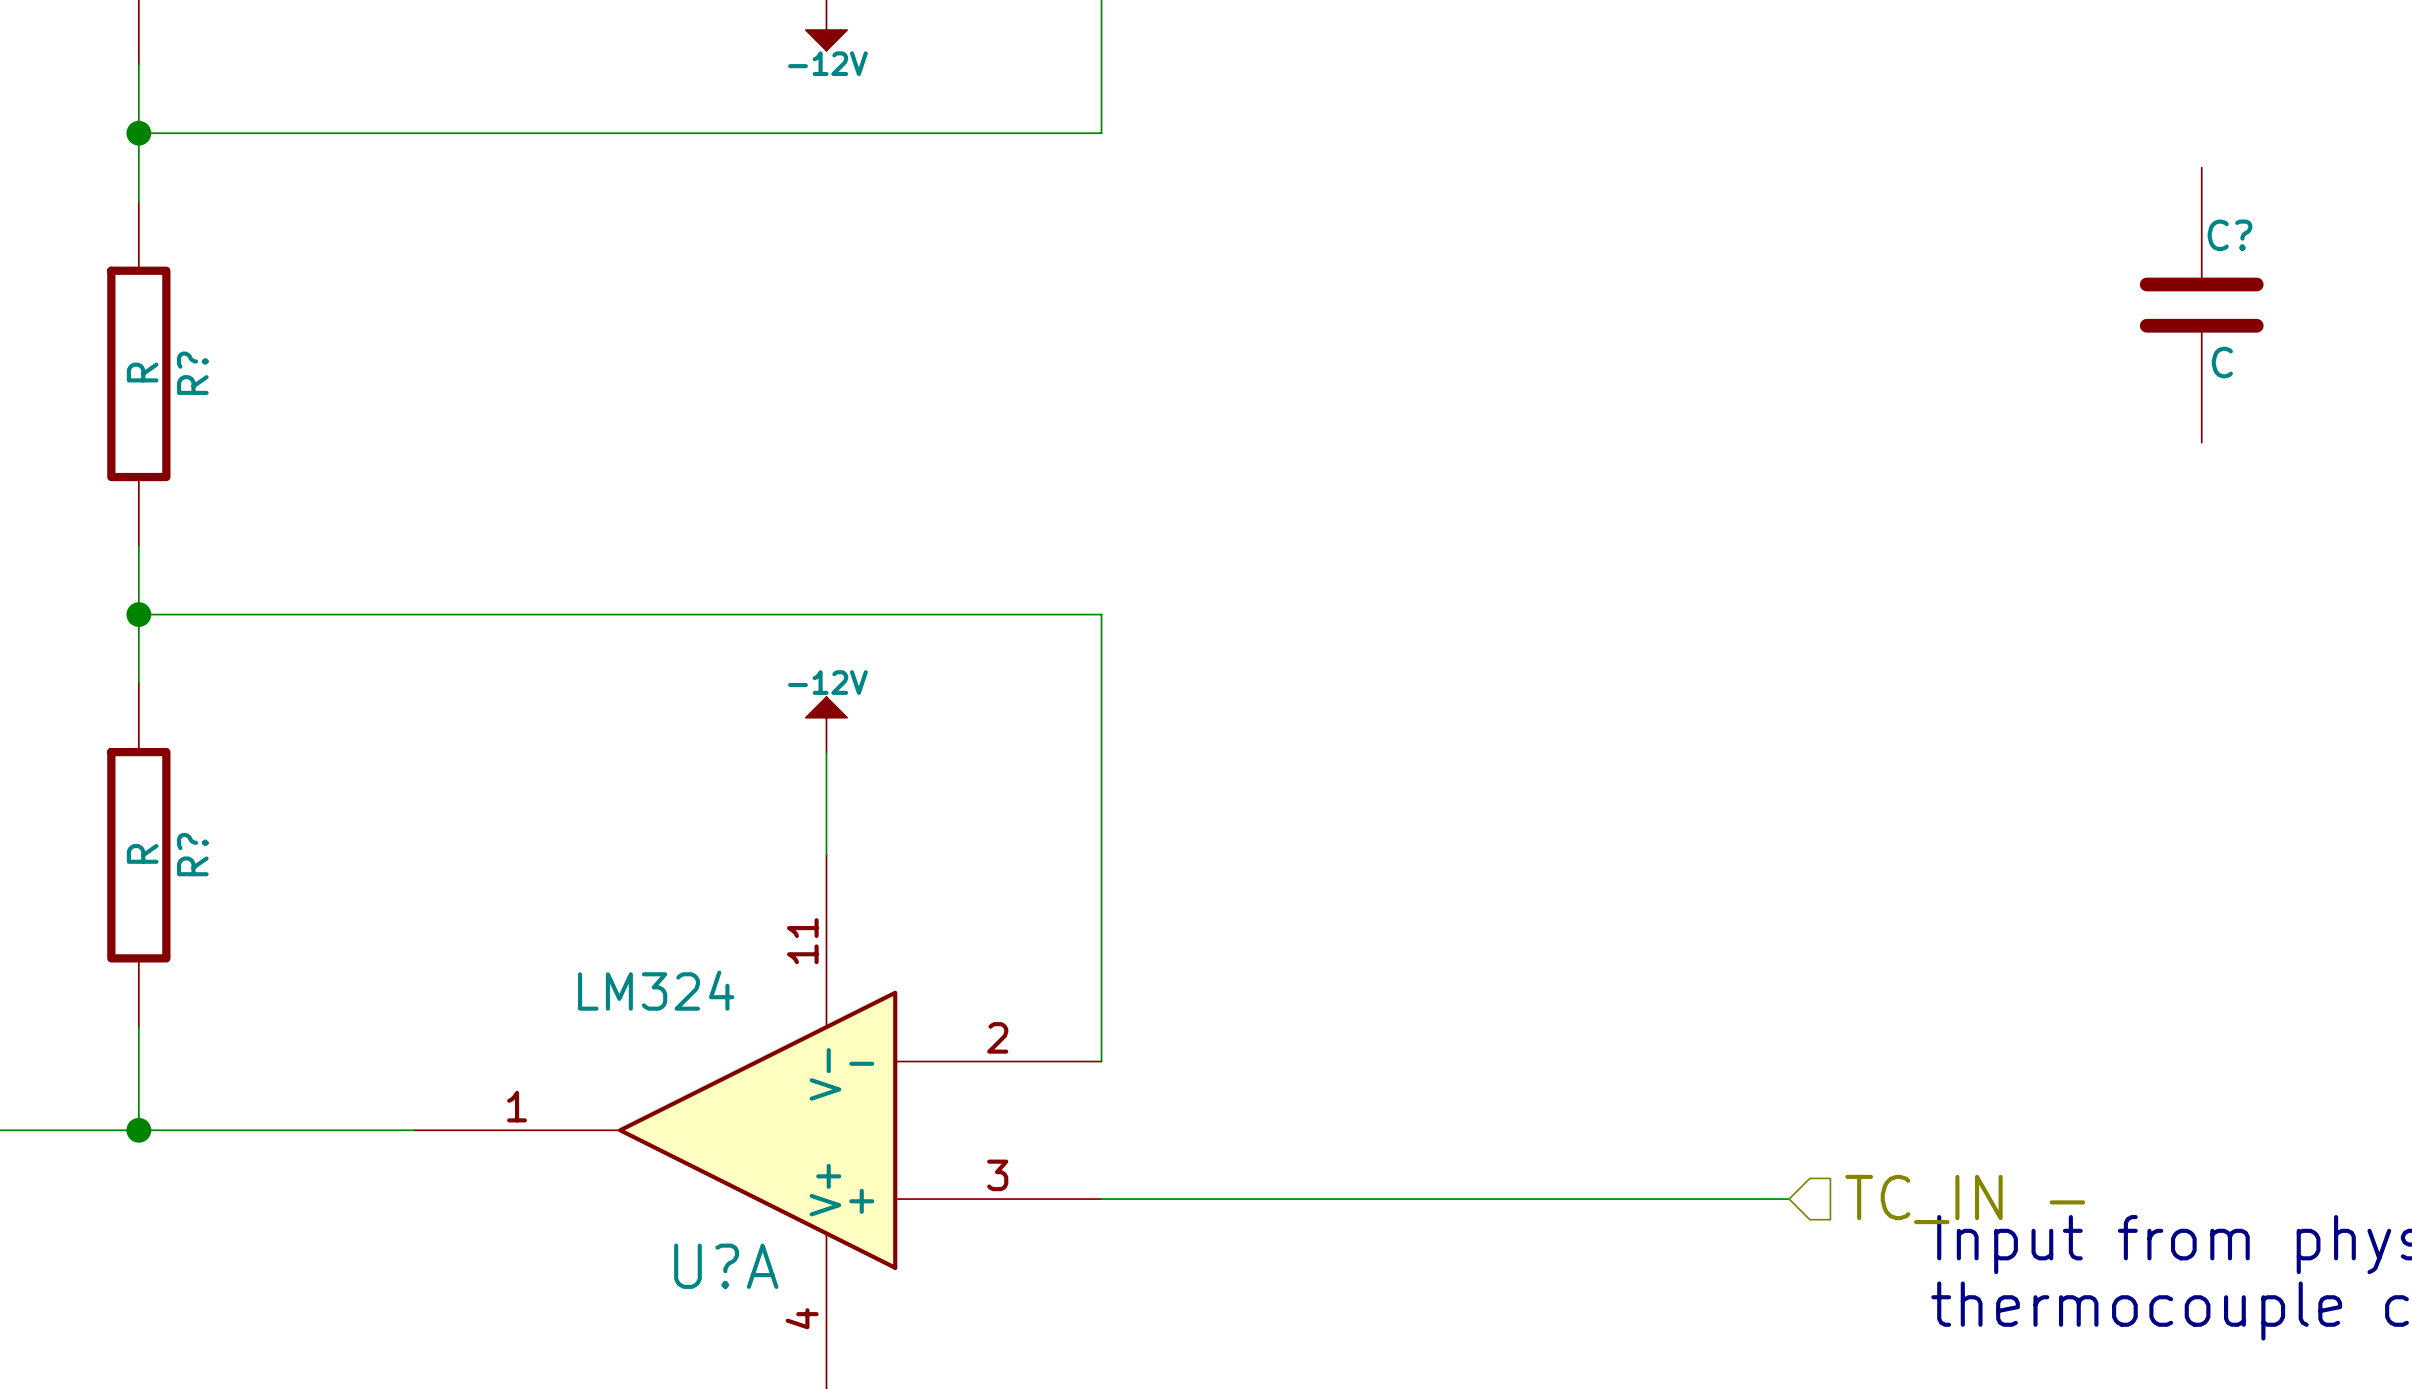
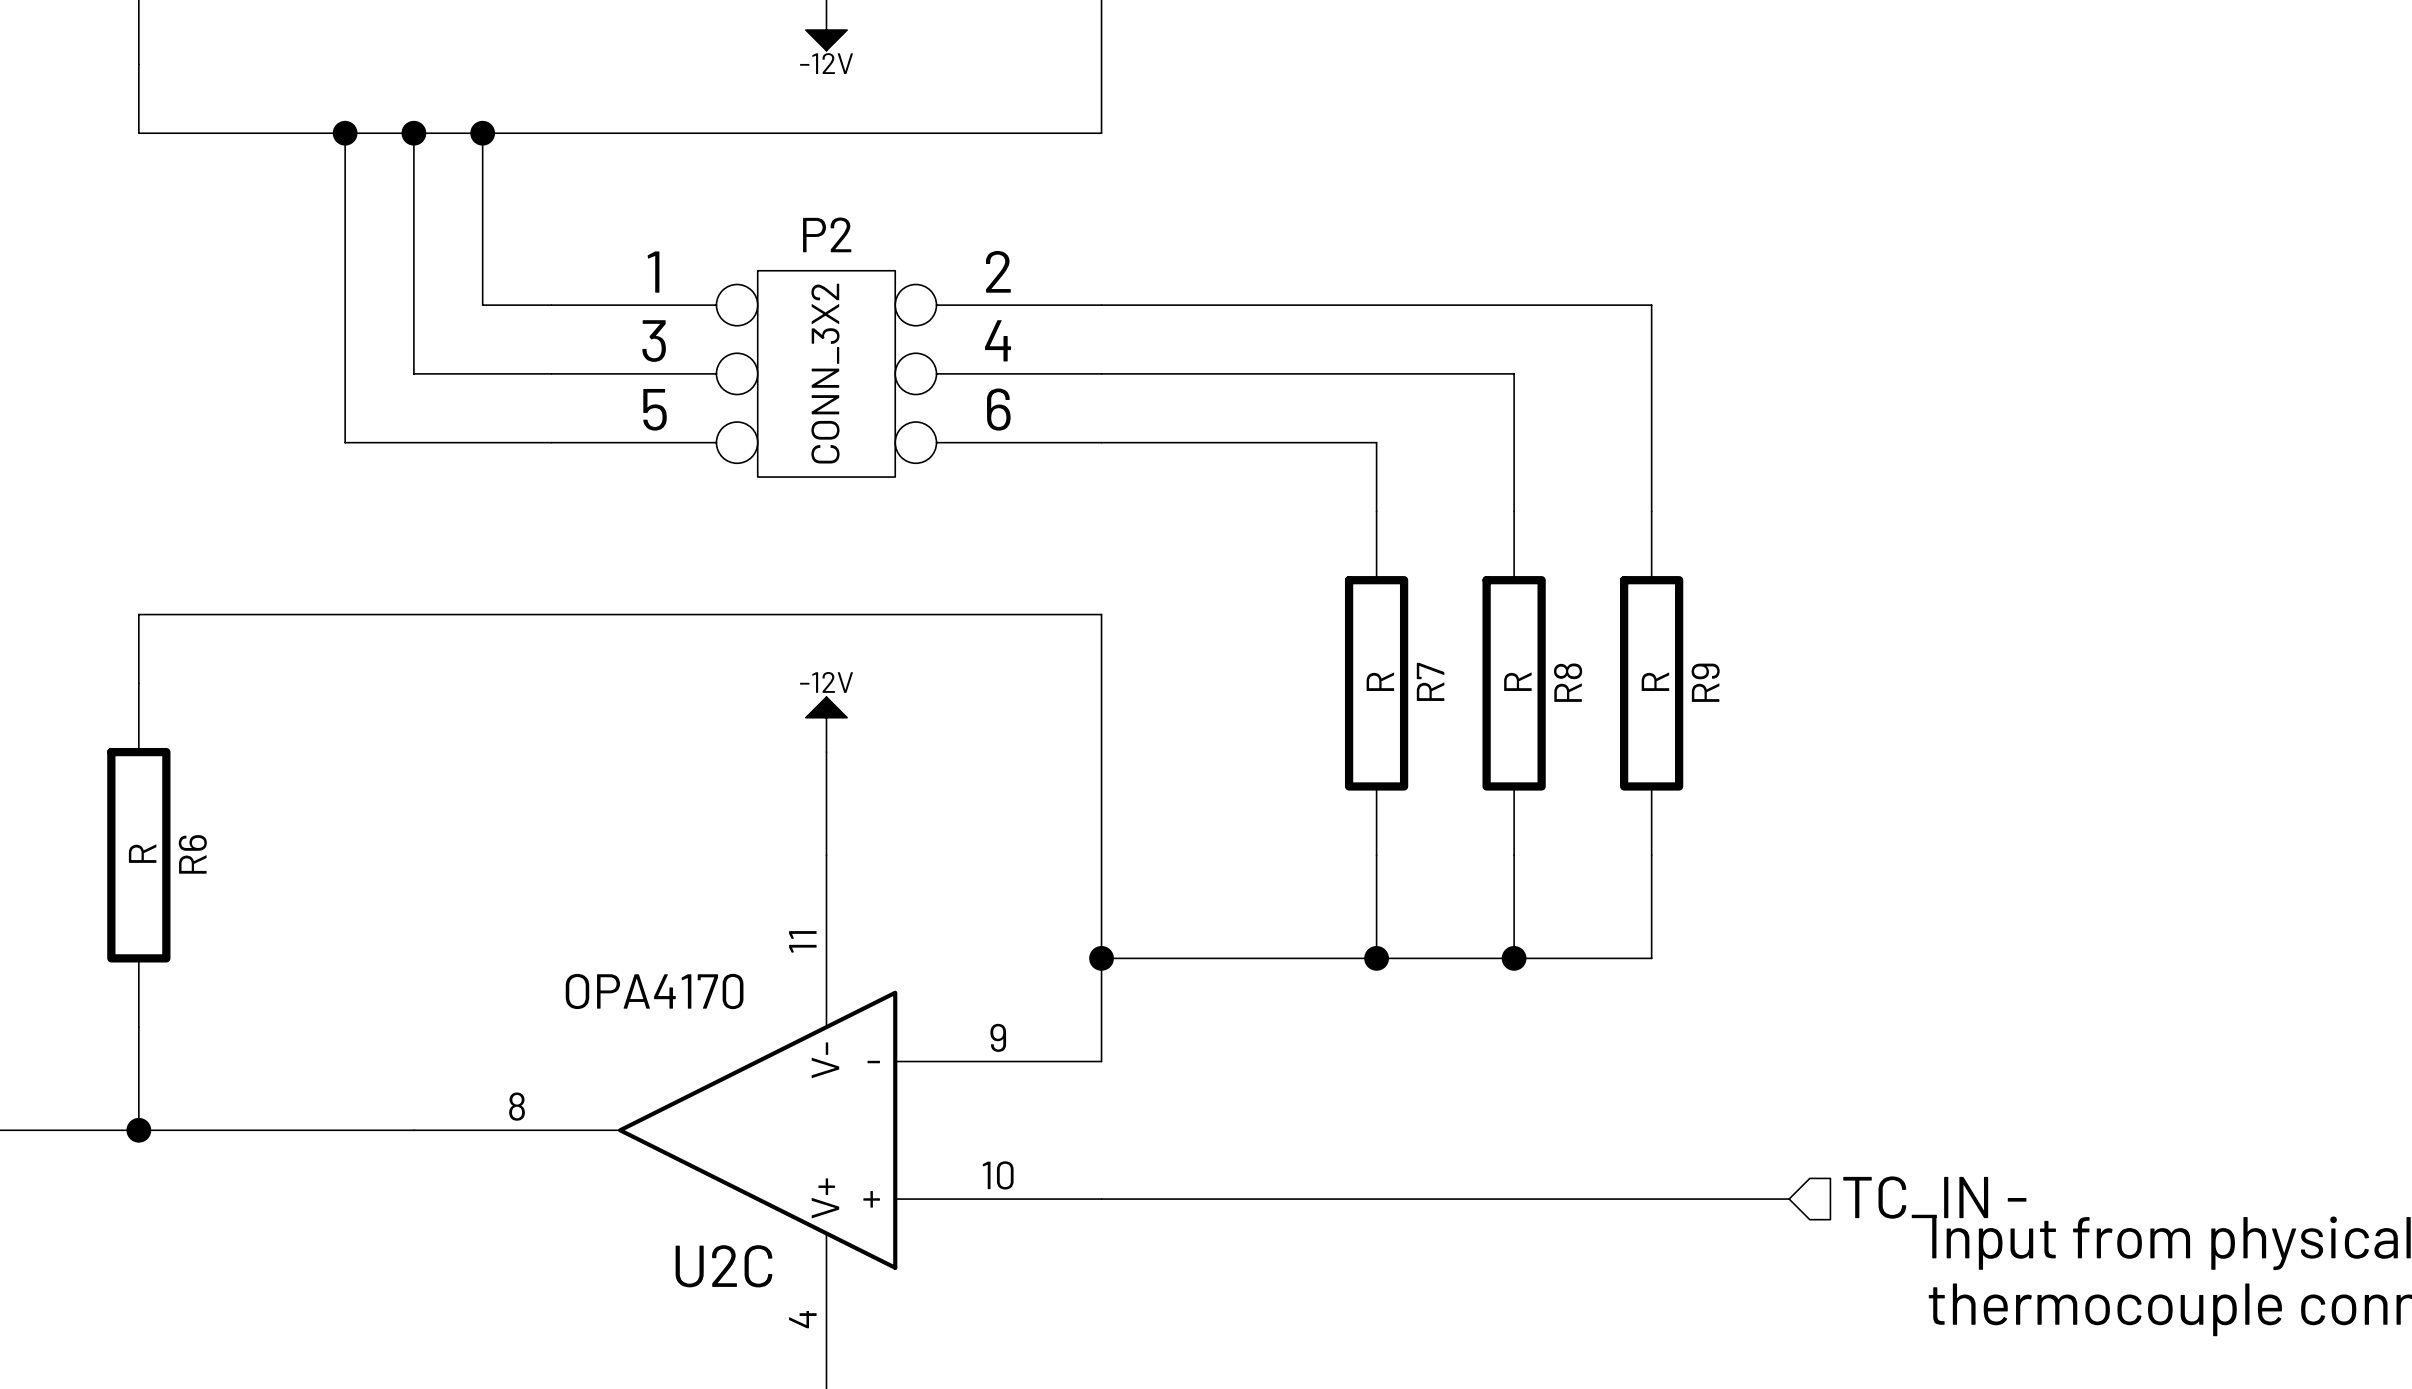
wire: (138, 133) (138, 201) -> none
junction: (138, 133) -> none
wire: none -> (345, 133) (345, 442) (551, 442)
junction: none -> (345, 133)
wire: none -> (413, 133) (413, 373) (551, 373)
junction: none -> (413, 133)
wire: none -> (482, 133) (482, 305) (551, 305)
junction: none -> (482, 133)
wire: none -> (1101, 305) (1651, 305) (1651, 511)
C?: C (2201, 305) -> none
R?: R (138, 373) -> none
P2: none -> CONN_3X2 (826, 373)
wire: none -> (1101, 373) (1514, 373) (1514, 511)
wire: none -> (1101, 442) (1376, 442) (1376, 511)
wire: (138, 545) (138, 614) -> none
junction: (138, 614) -> none
R7: none -> R (1376, 683)
R8: none -> R (1514, 683)
R9: none -> R (1651, 683)
R? name: R? (192, 854) -> R6 (192, 854)
wire: none -> (1376, 855) (1376, 958)
wire: none -> (1514, 855) (1514, 958)
wire: none -> (1651, 855) (1651, 958) (1101, 958)
junction: none -> (1101, 958)
junction: none -> (1376, 958)
junction: none -> (1514, 958)
U?A value: LM324 (656, 990) -> OPA4170 (654, 991)
U?A pin number: 2 (997, 1037) -> 9 (998, 1037)
U?A pin number: 1 (517, 1106) -> 8 (517, 1106)
U?A pin number: 3 (997, 1175) -> 10 (998, 1175)
U?A name: U?A (726, 1266) -> U2C (723, 1266)

